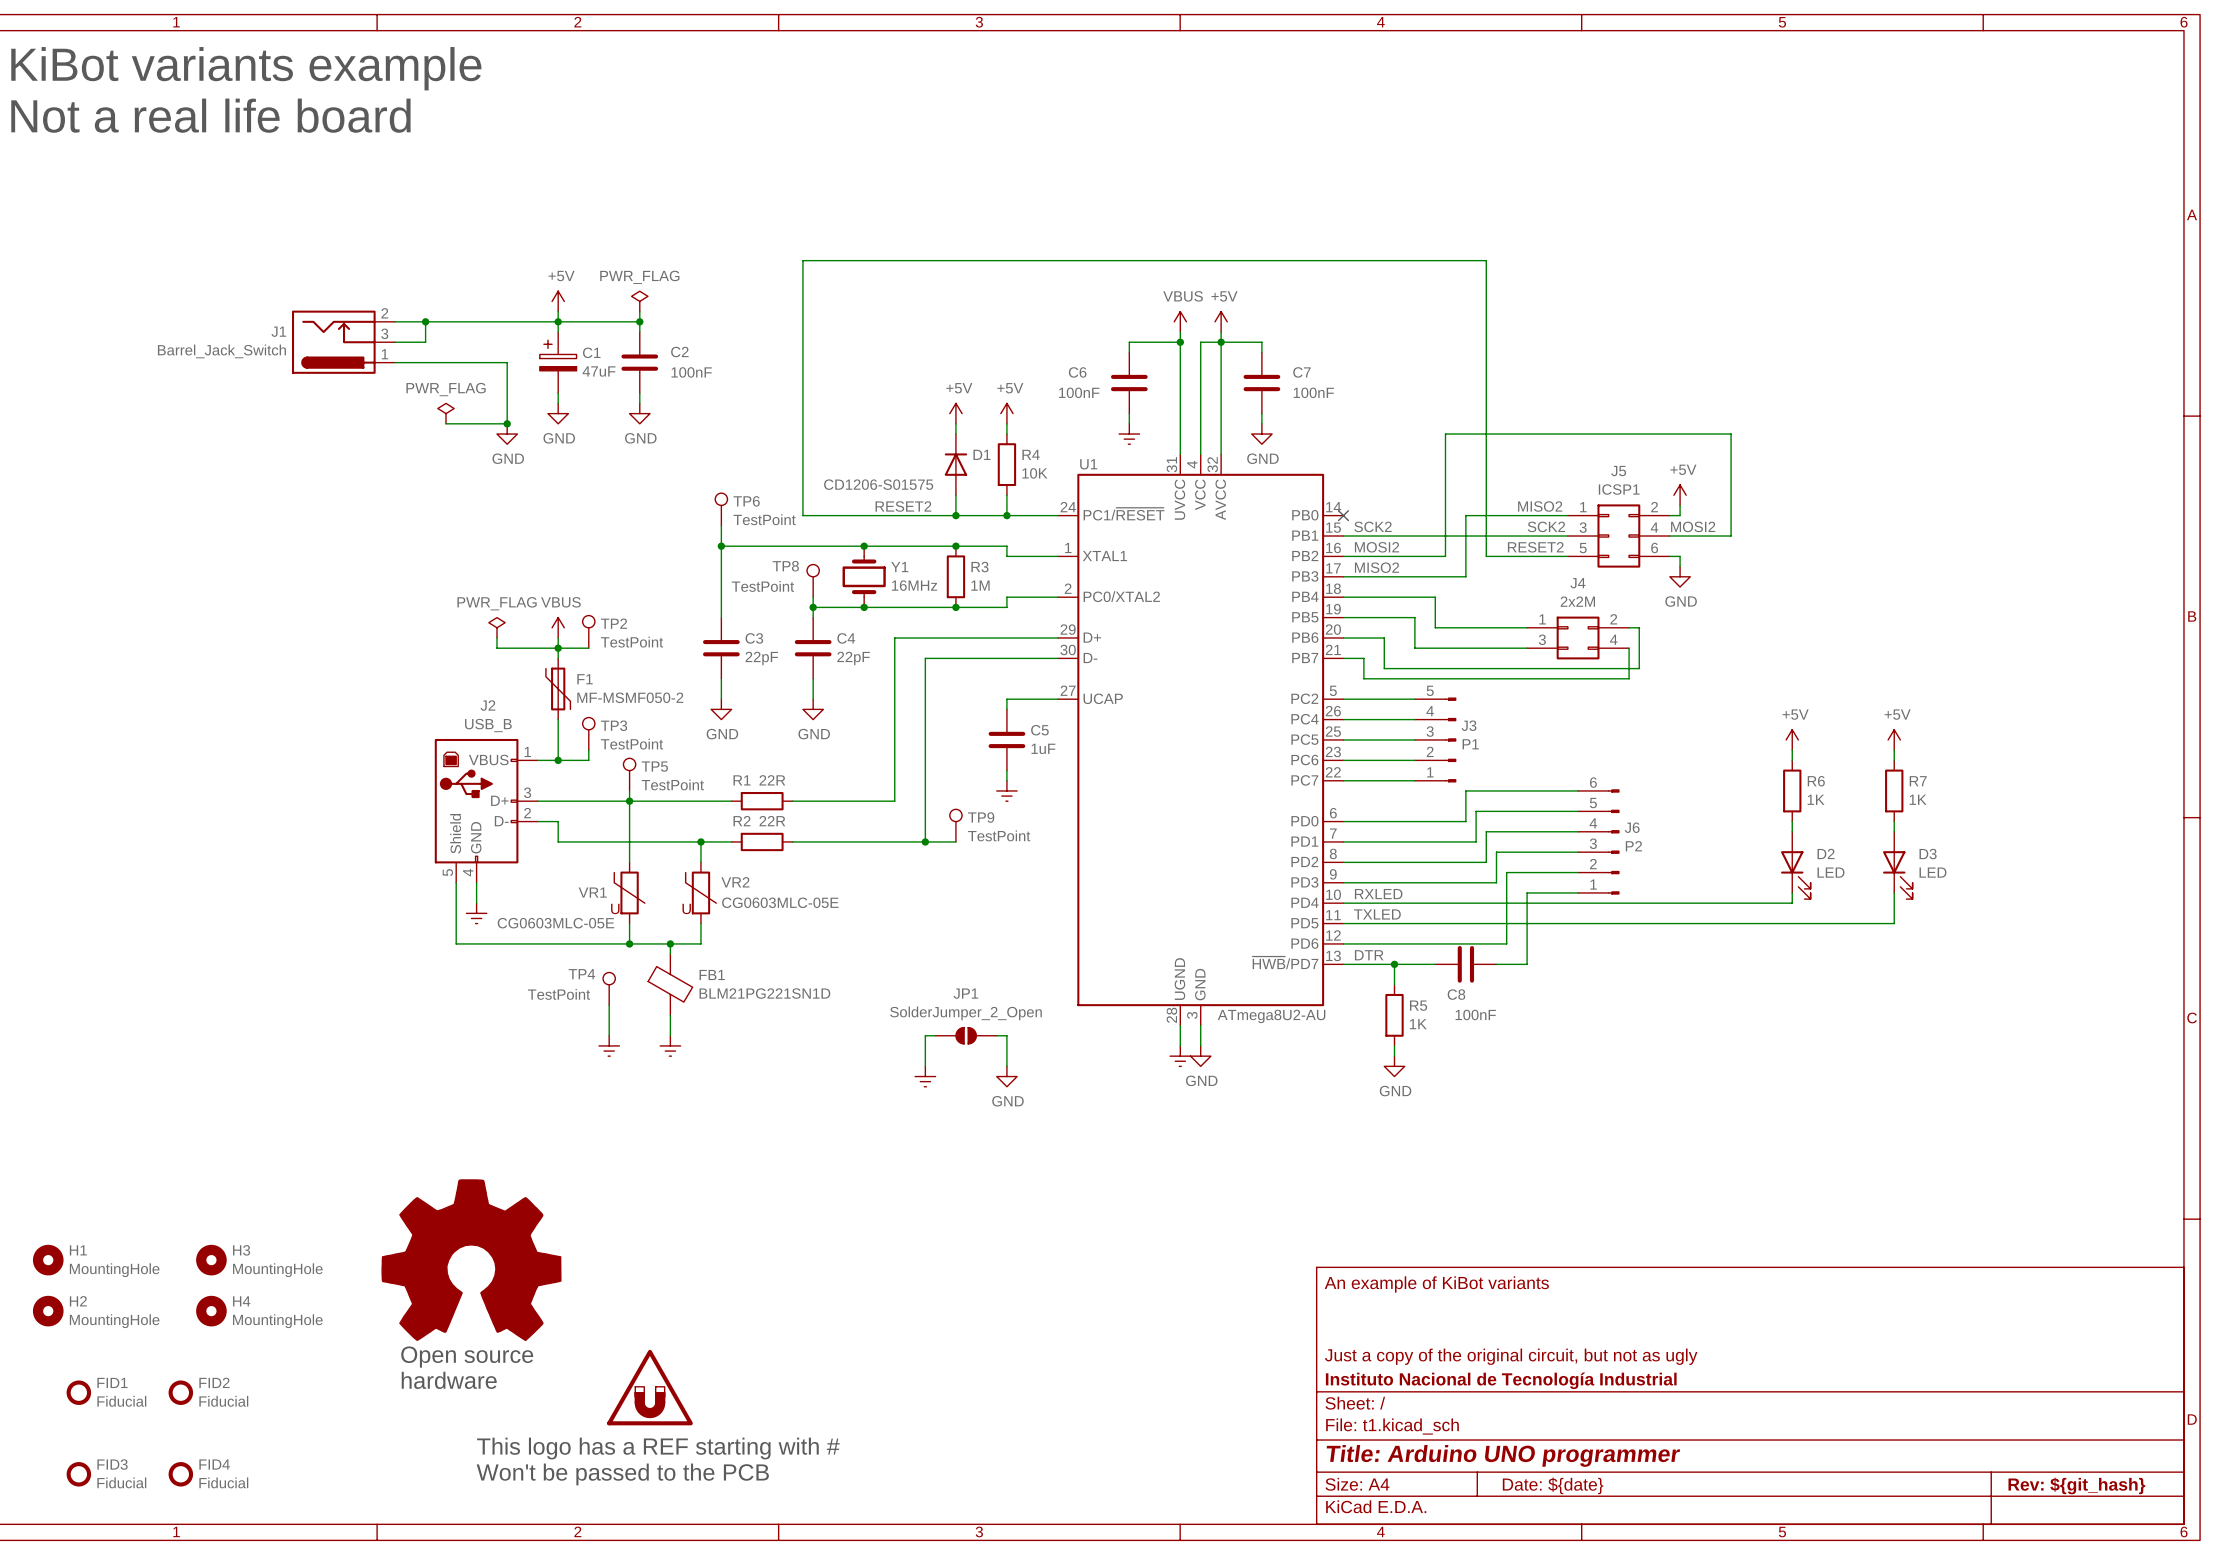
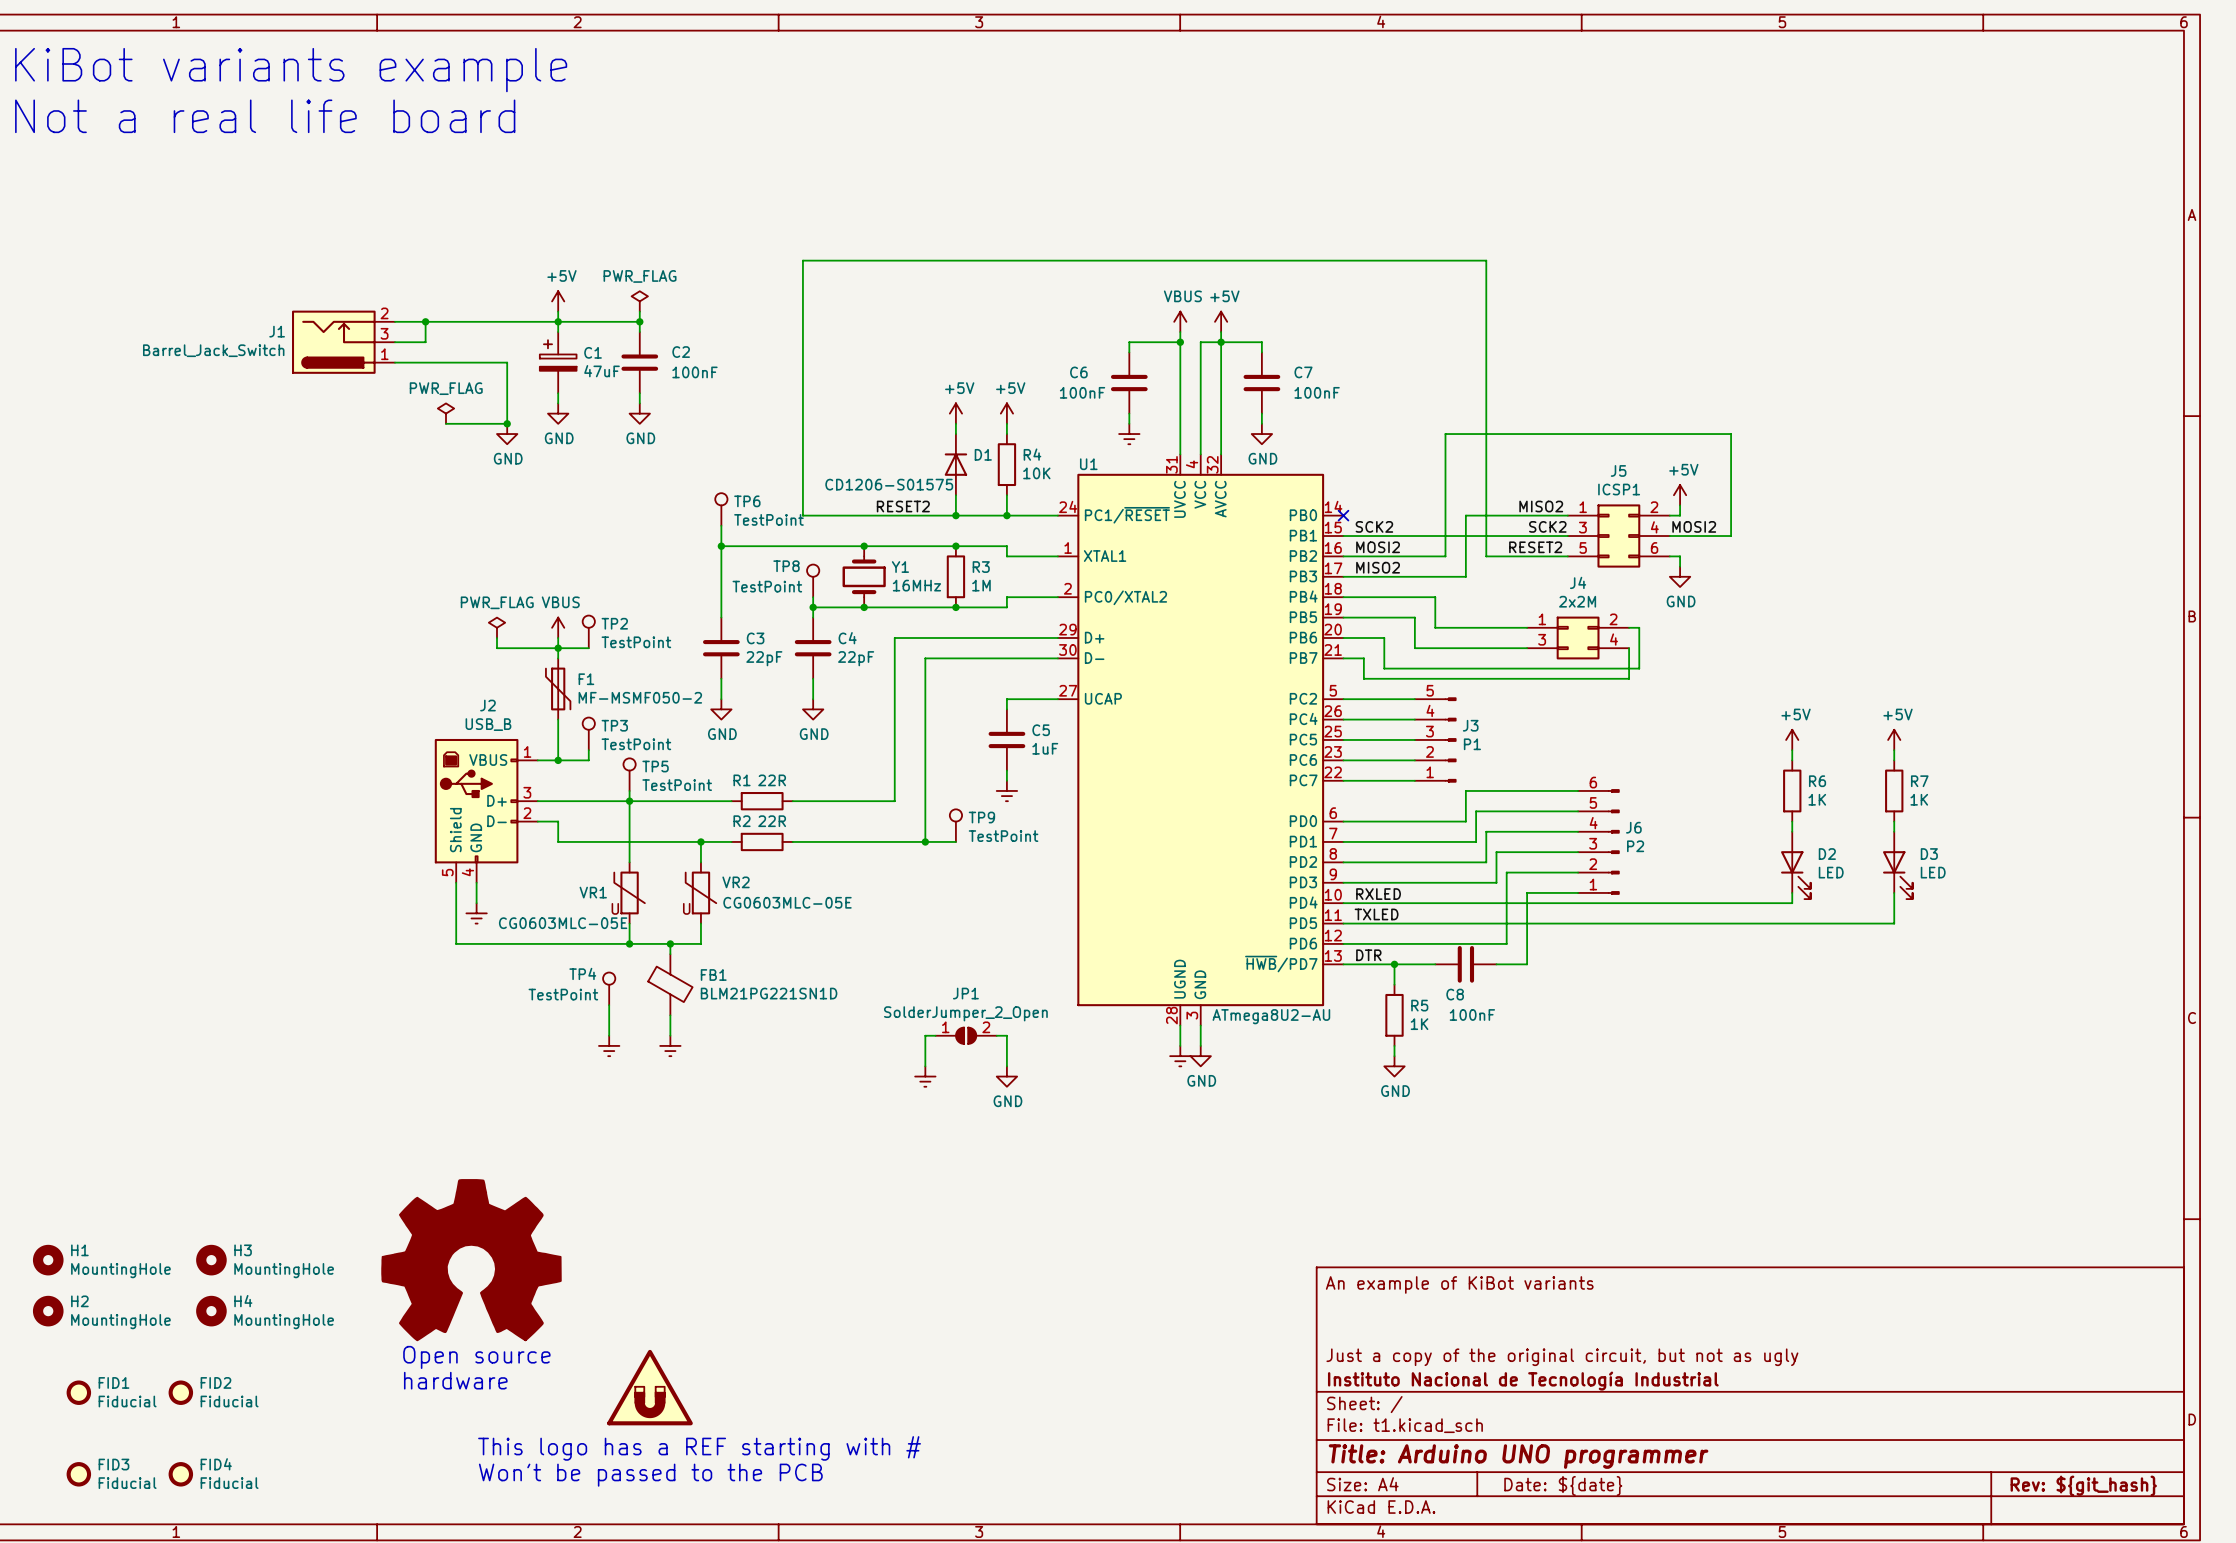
JP1 pin number: none -> 1 (945, 1027)
JP1 pin number: none -> 2 (986, 1027)

